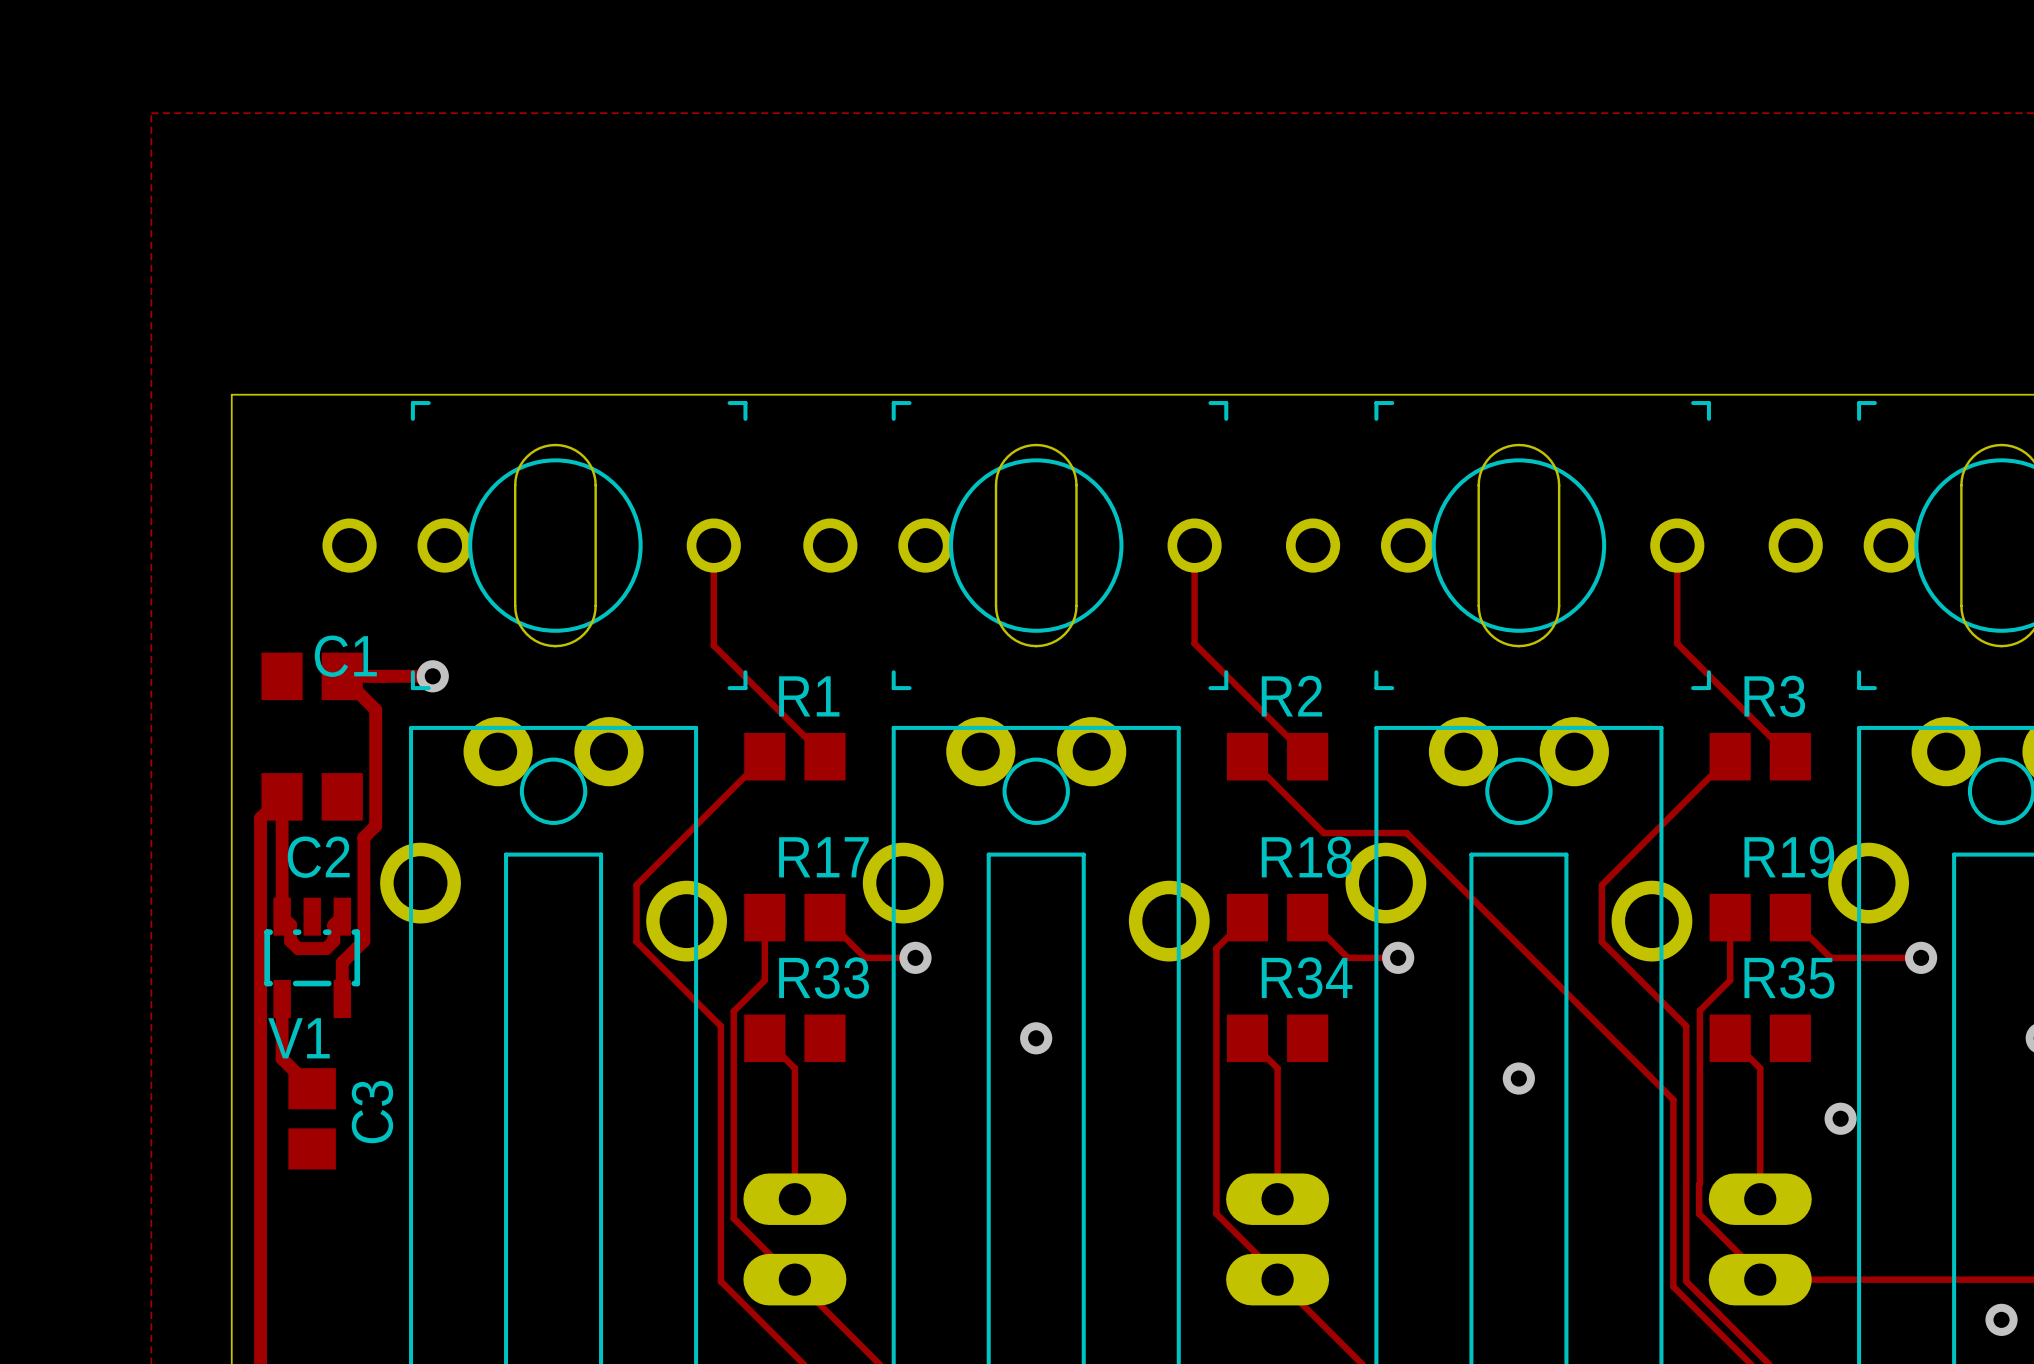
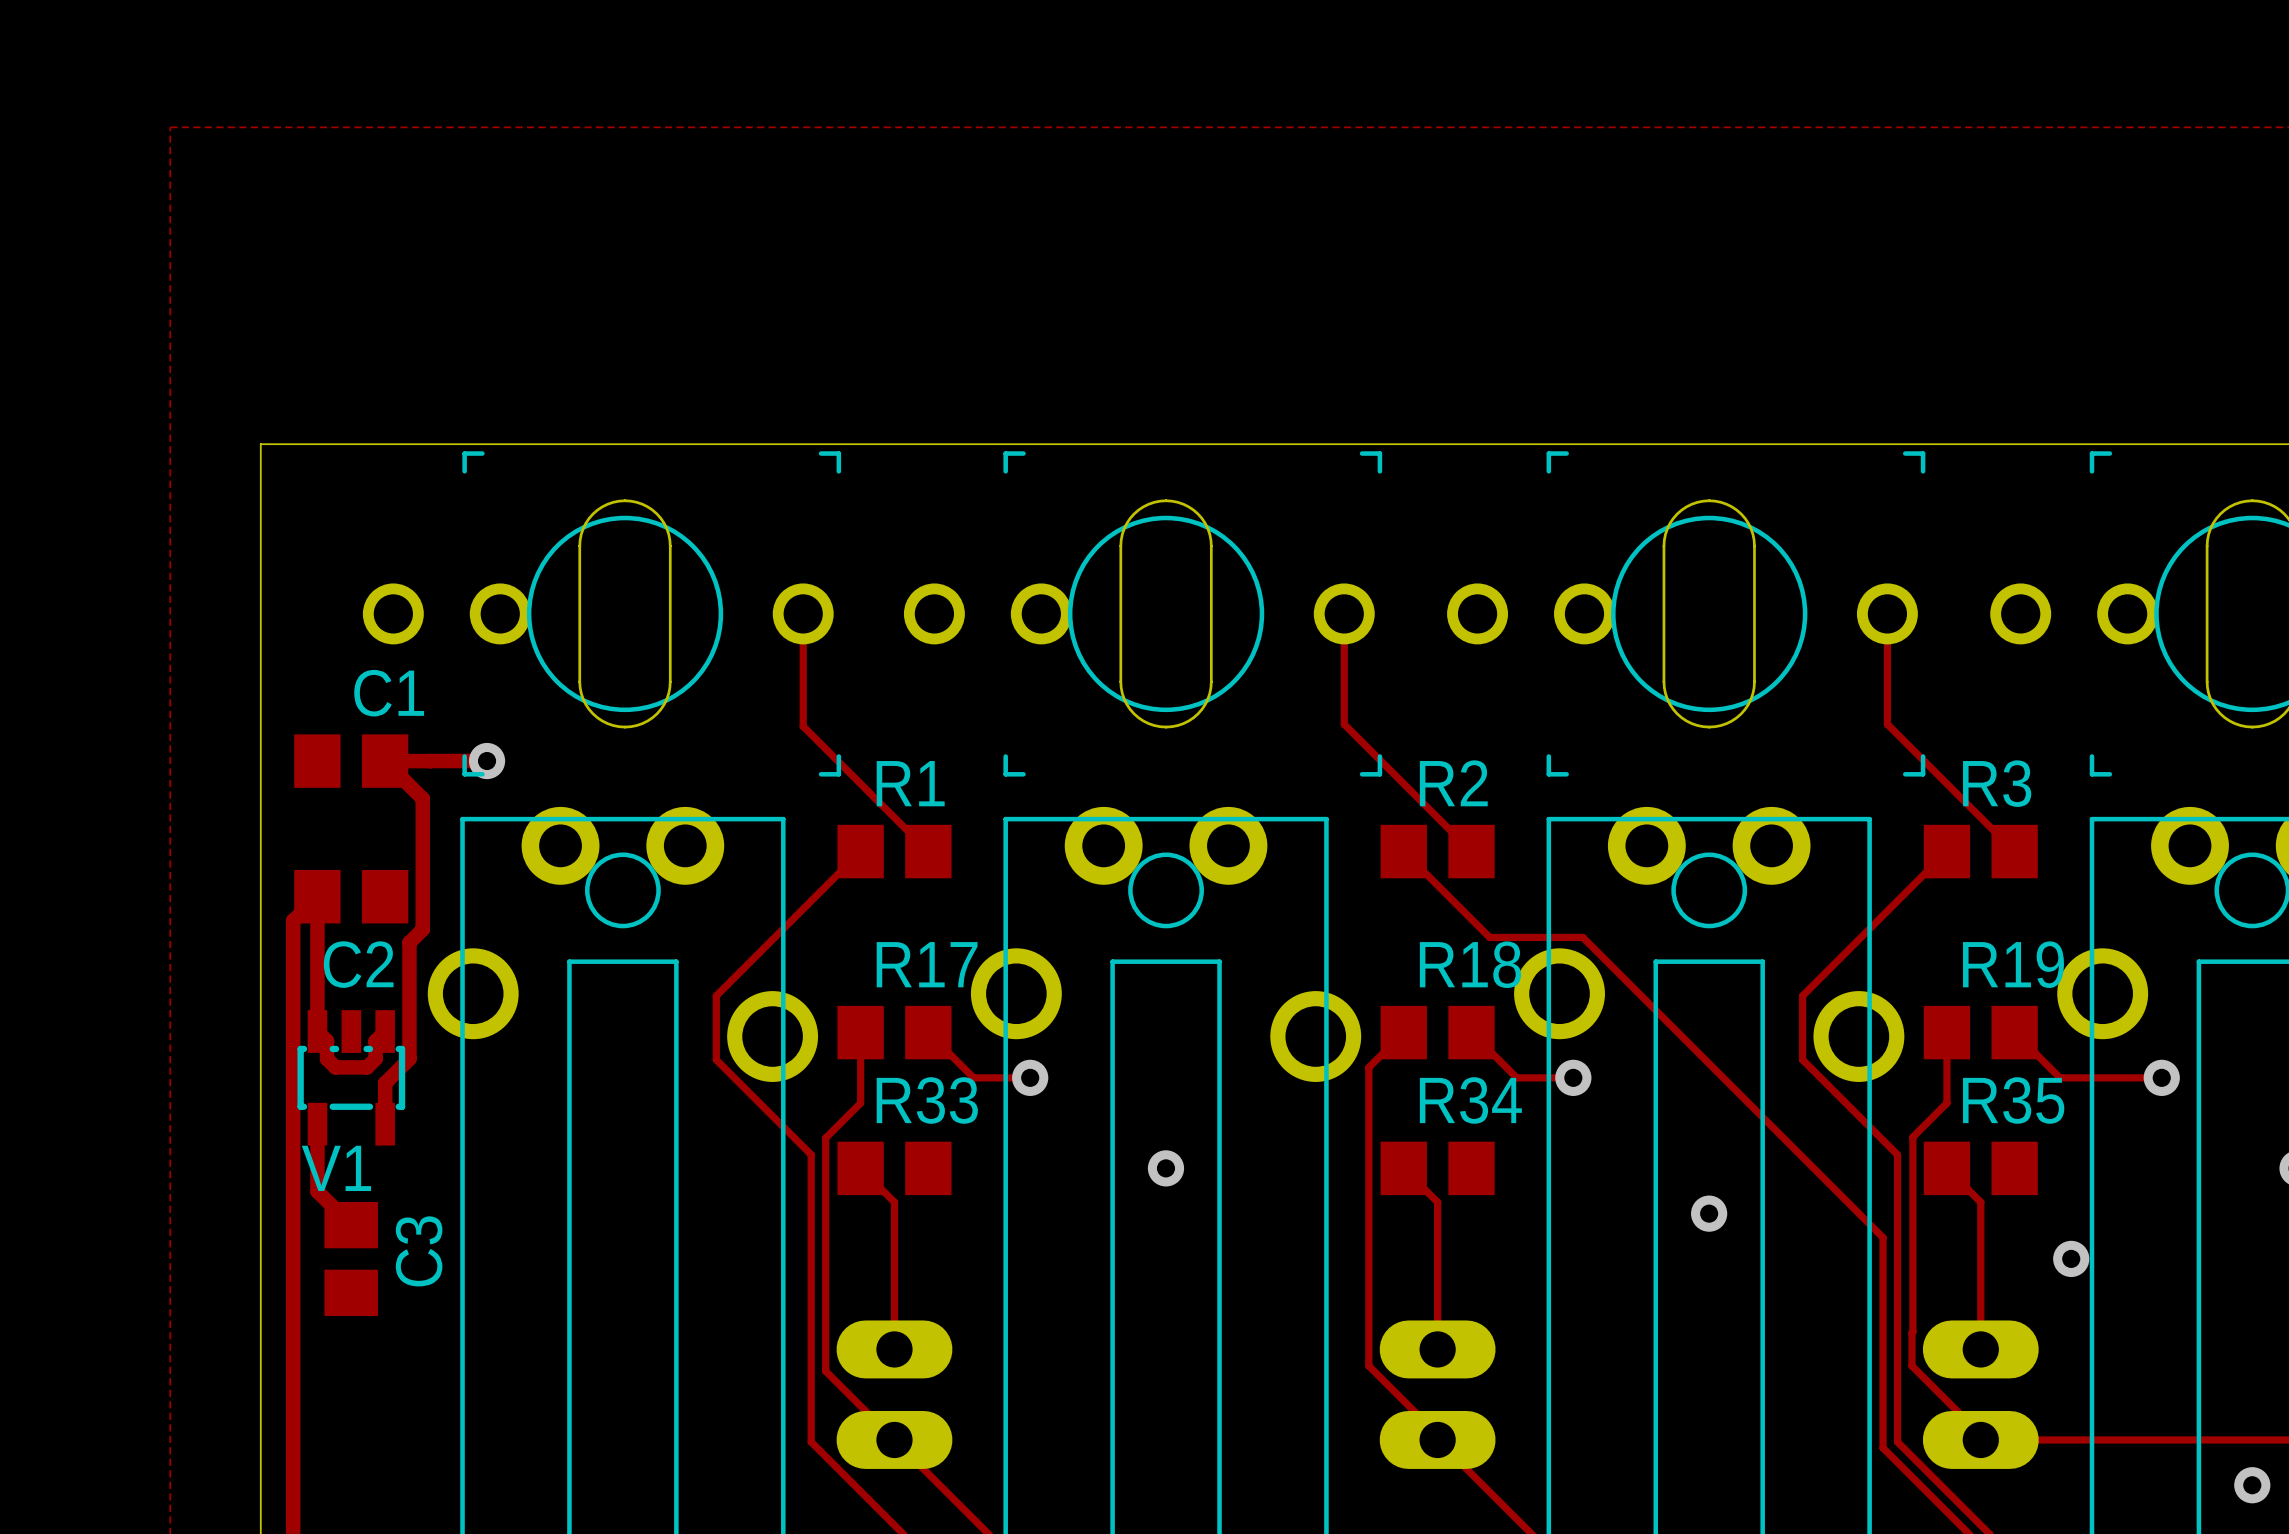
C1 name position: C1 (345, 656) -> C1 (389, 693)

